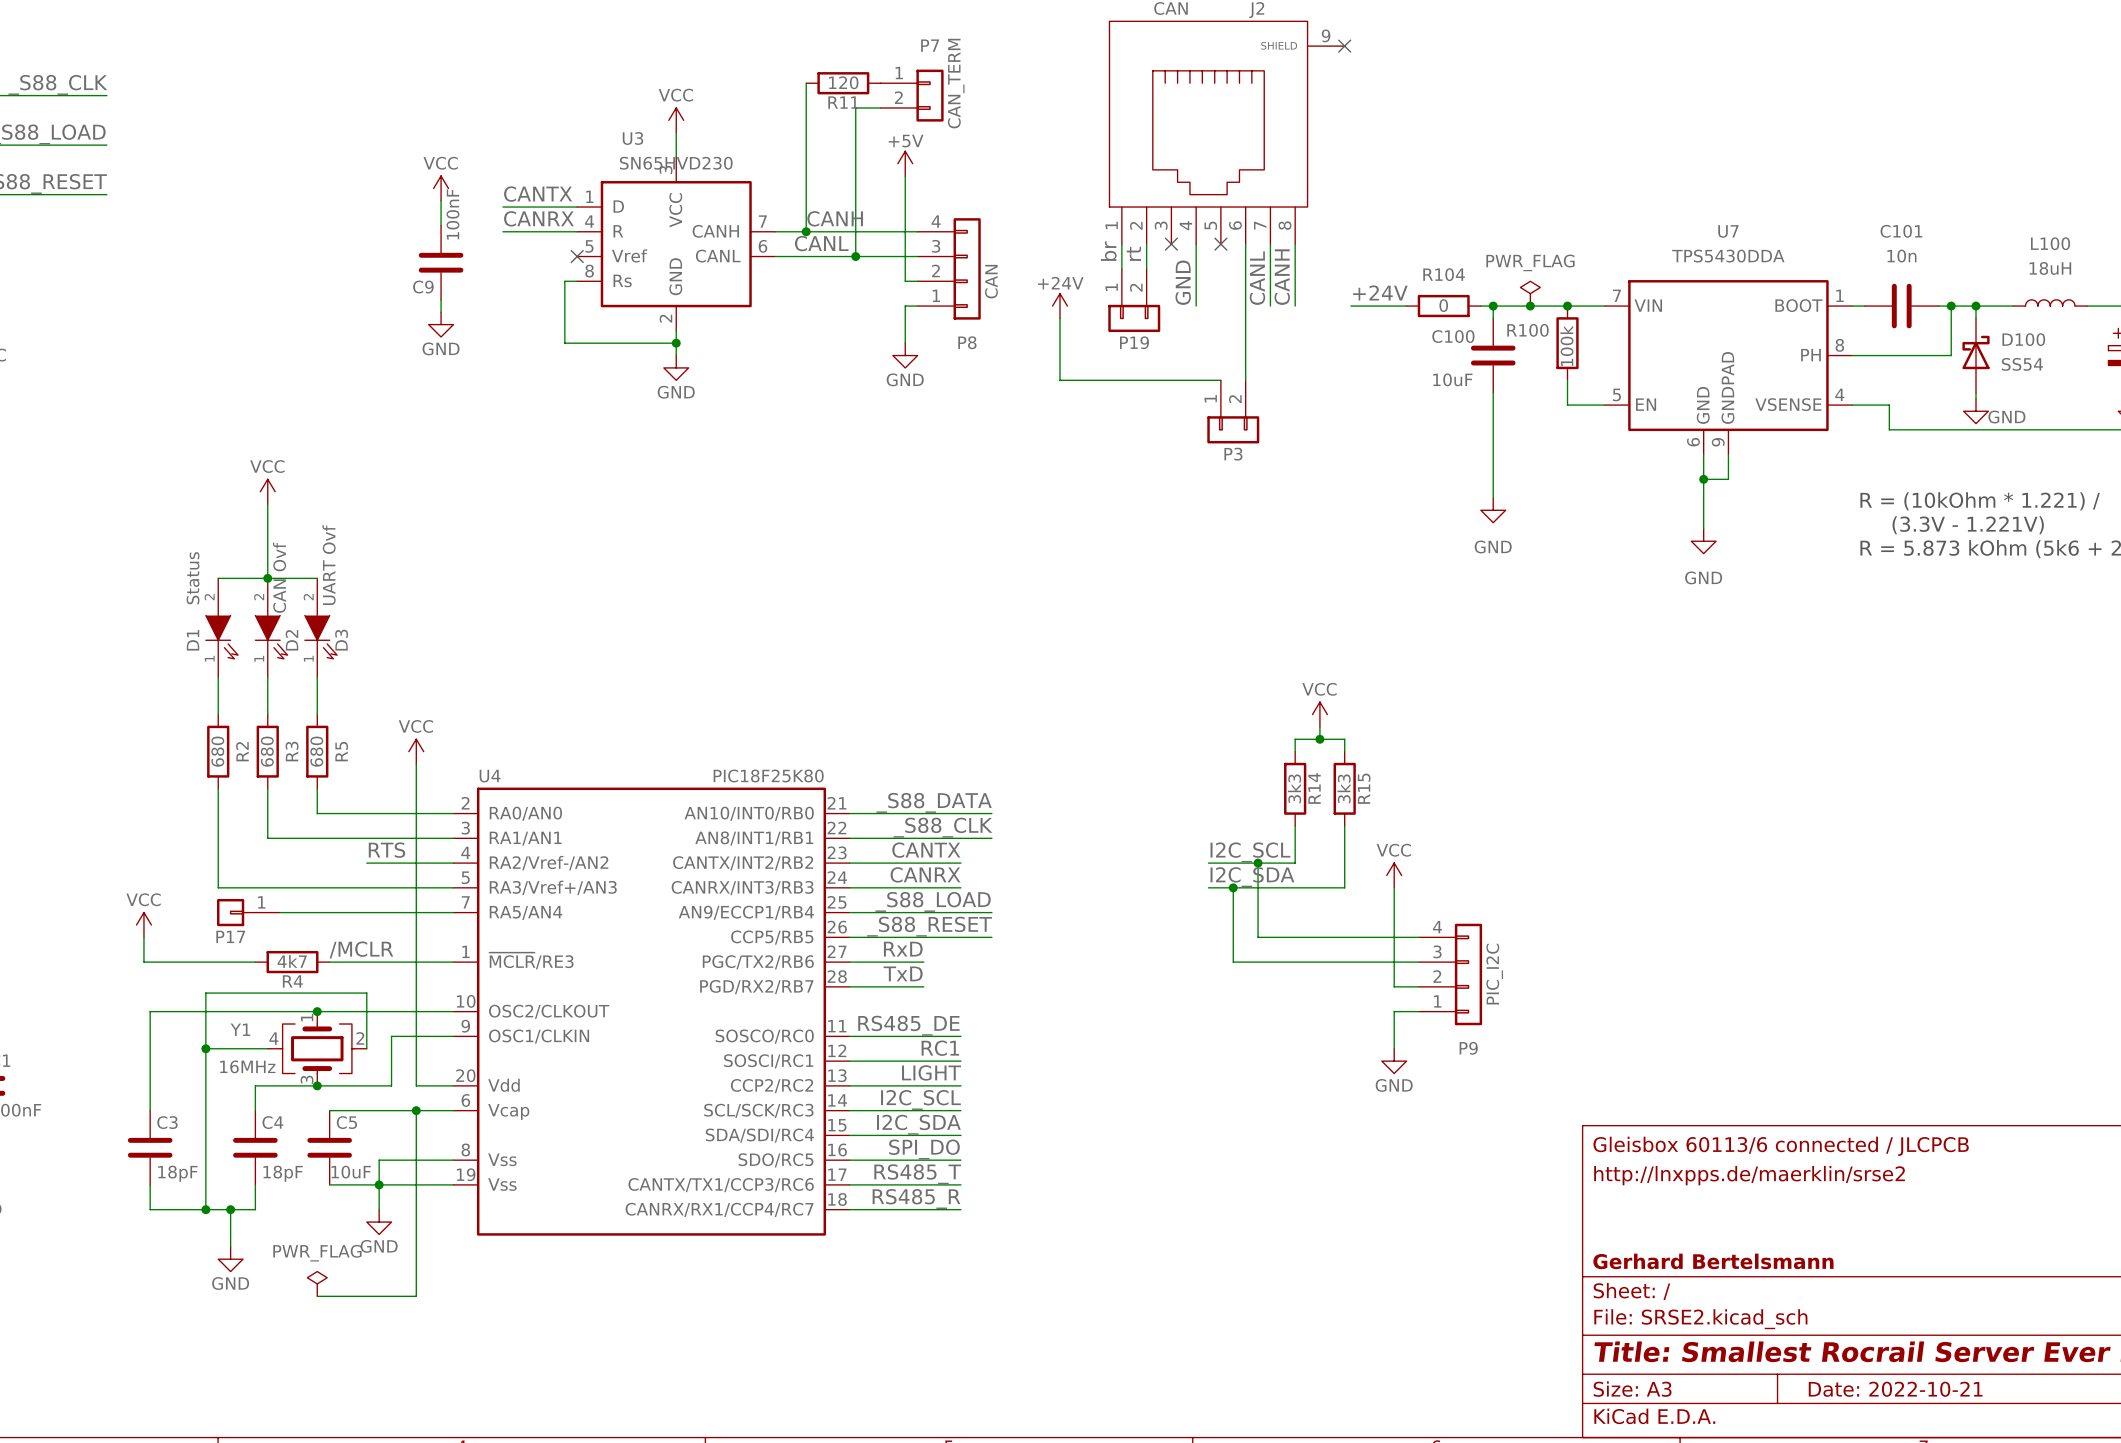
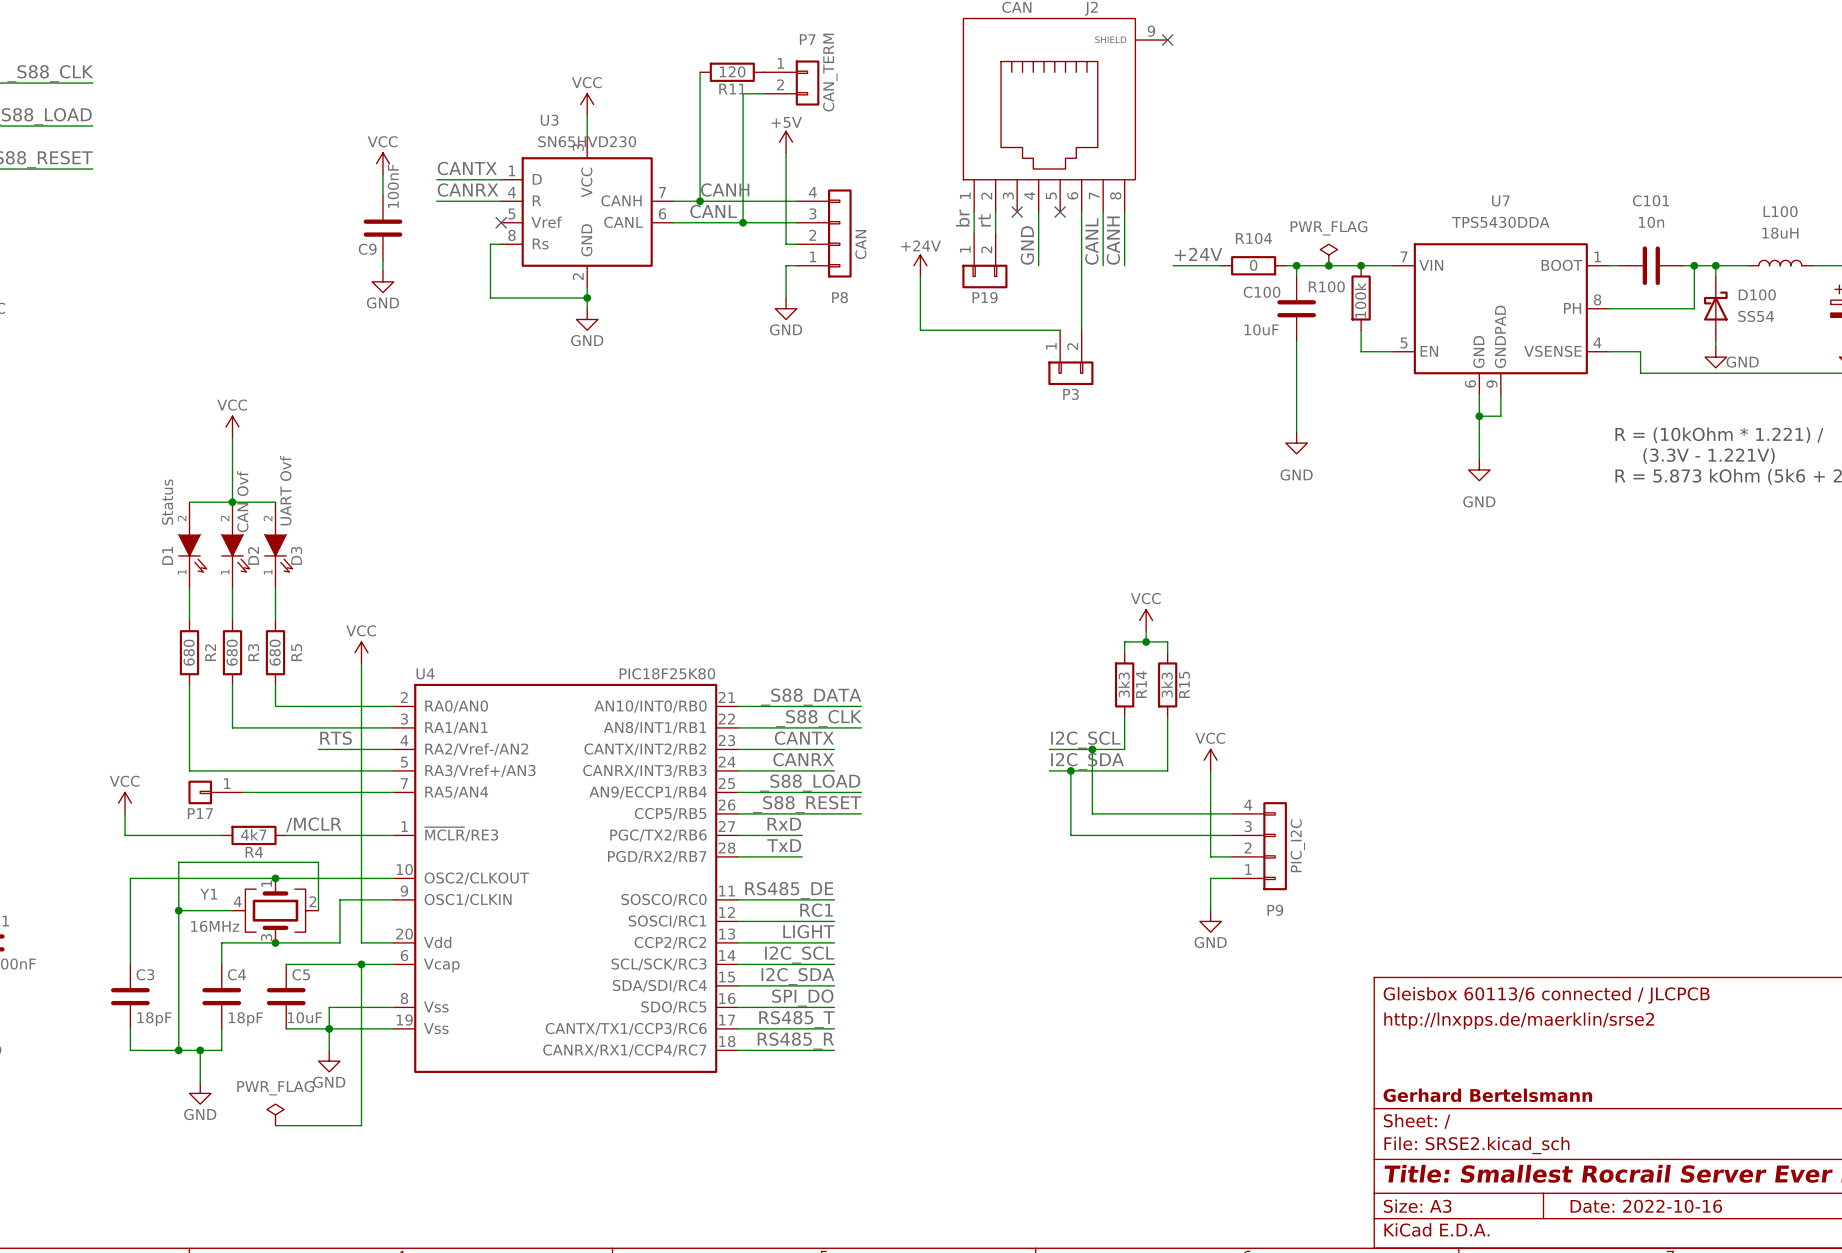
title block: Date: 2022-10-21 (1895, 1389) -> Date: 2022-10-16 (1646, 1206)

